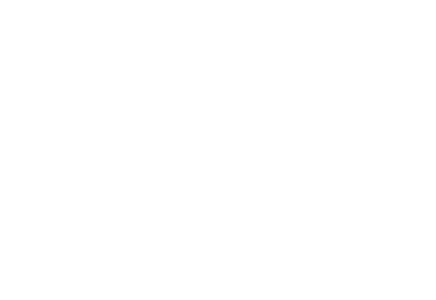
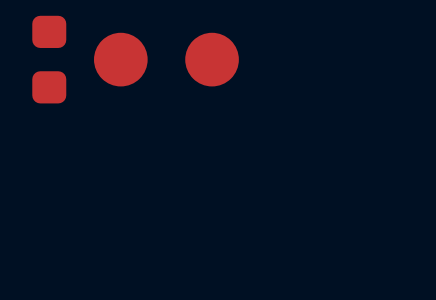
part: none -> (49, 59)
part: none -> (120, 59)
part: none -> (212, 59)

